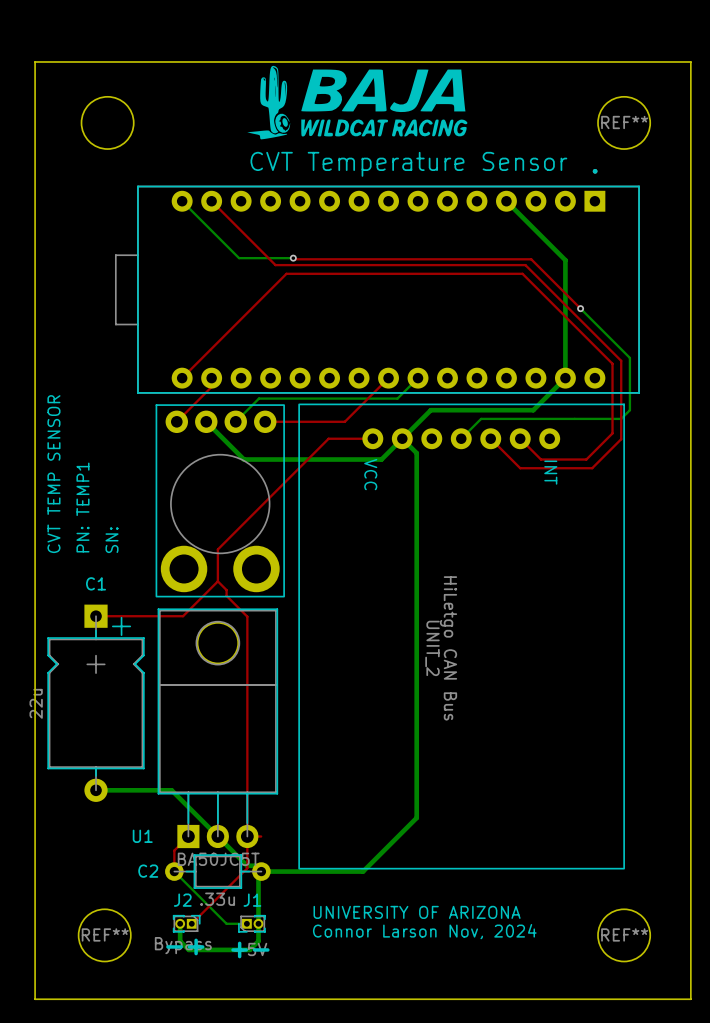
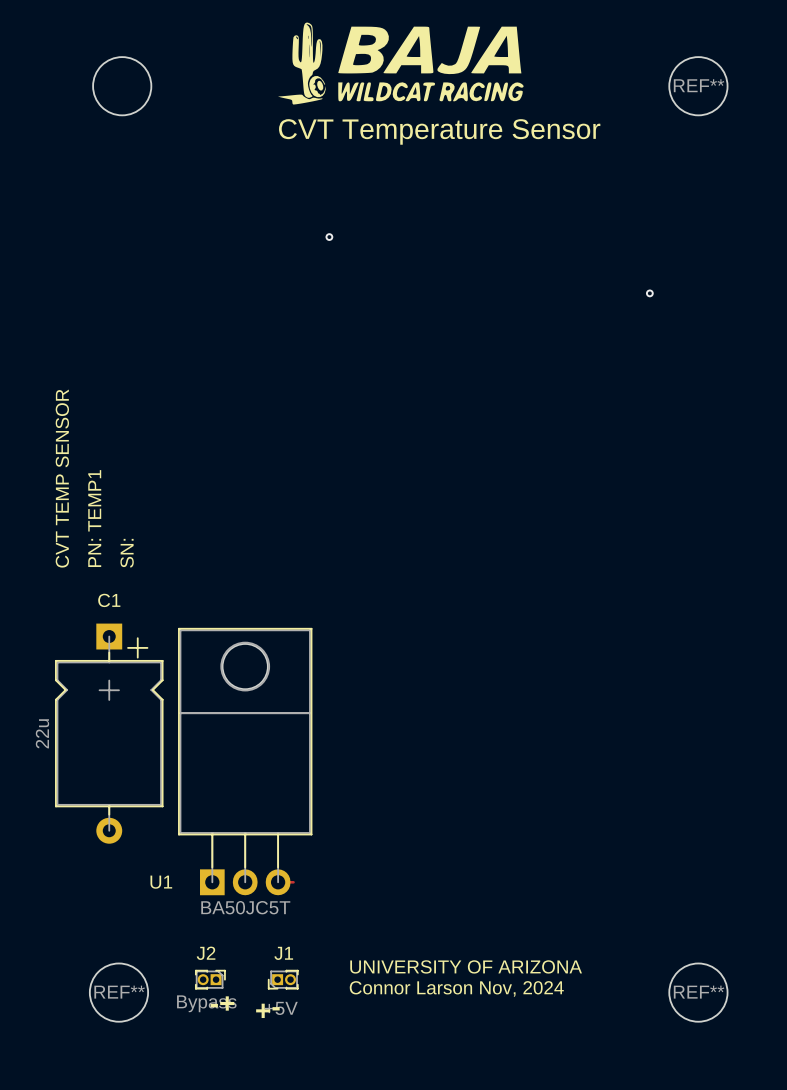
board edge: (35, 61) (690, 61) (690, 999) (35, 999) (35, 61) -> none
bottom track: (182, 201) (239, 258) (293, 258) -> none
top track: (211, 201) (275, 265) (525, 265) (621, 360) (621, 439) (592, 468) (520, 468) (490, 438) -> none
bottom track: (506, 201) (565, 260) (565, 378) (533, 410) (430, 410) (381, 459) (243, 459) (206, 421) -> none
top track: (293, 258) (531, 259) (580, 308) -> none
part: (377, 281) -> none
bottom track: (580, 308) (629, 357) (629, 410) (621, 418) (481, 418) (461, 438) -> none
top track: (182, 378) (286, 273) (522, 273) (612, 363) (612, 433) (586, 459) (541, 459) (520, 438) -> none
top track: (211, 378) (211, 386) (176, 421) -> none
top track: (388, 378) (344, 421) (265, 421) -> none
bottom track: (418, 378) (397, 398) (258, 398) (235, 421) -> none
top track: (372, 438) (328, 438) (217, 549) (217, 581) -> none
bottom track: (402, 438) (416, 453) (416, 817) (363, 871) (261, 871) -> none
part: (220, 500) -> none
top track: (217, 581) (183, 616) (96, 616) -> none
top track: (217, 581) (226, 590) (226, 595) (247, 616) (247, 868) (191, 923) -> none
UNIT_2: HiLetgo CAN Bus (461, 636) -> none
bottom track: (96, 790) (171, 790) (247, 865) (255, 865) (261, 871) -> none
top track: (188, 836) (174, 850) (174, 871) -> none
bottom track: (174, 871) (226, 923) (246, 923) -> none
C2: .33u (217, 871) -> none
bottom track: (261, 871) (258, 874) (258, 941) (249, 949) (188, 949) (180, 941) (180, 923) -> none

